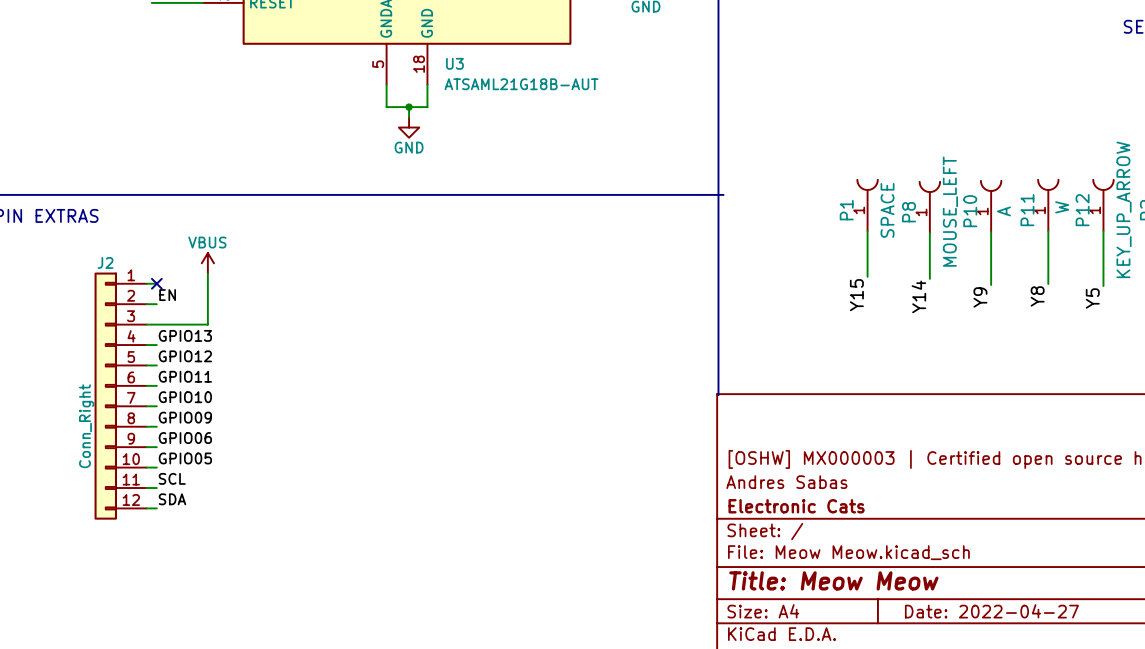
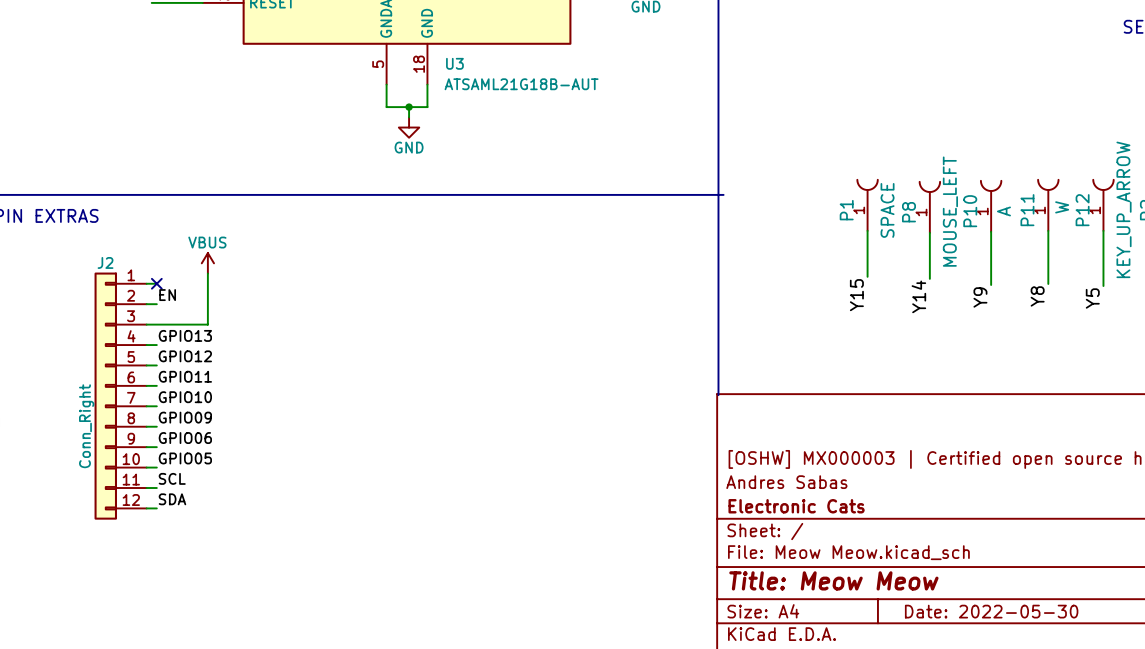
title block: Date: 2022-04-27 (991, 611) -> Date: 2022-05-30 (991, 611)

